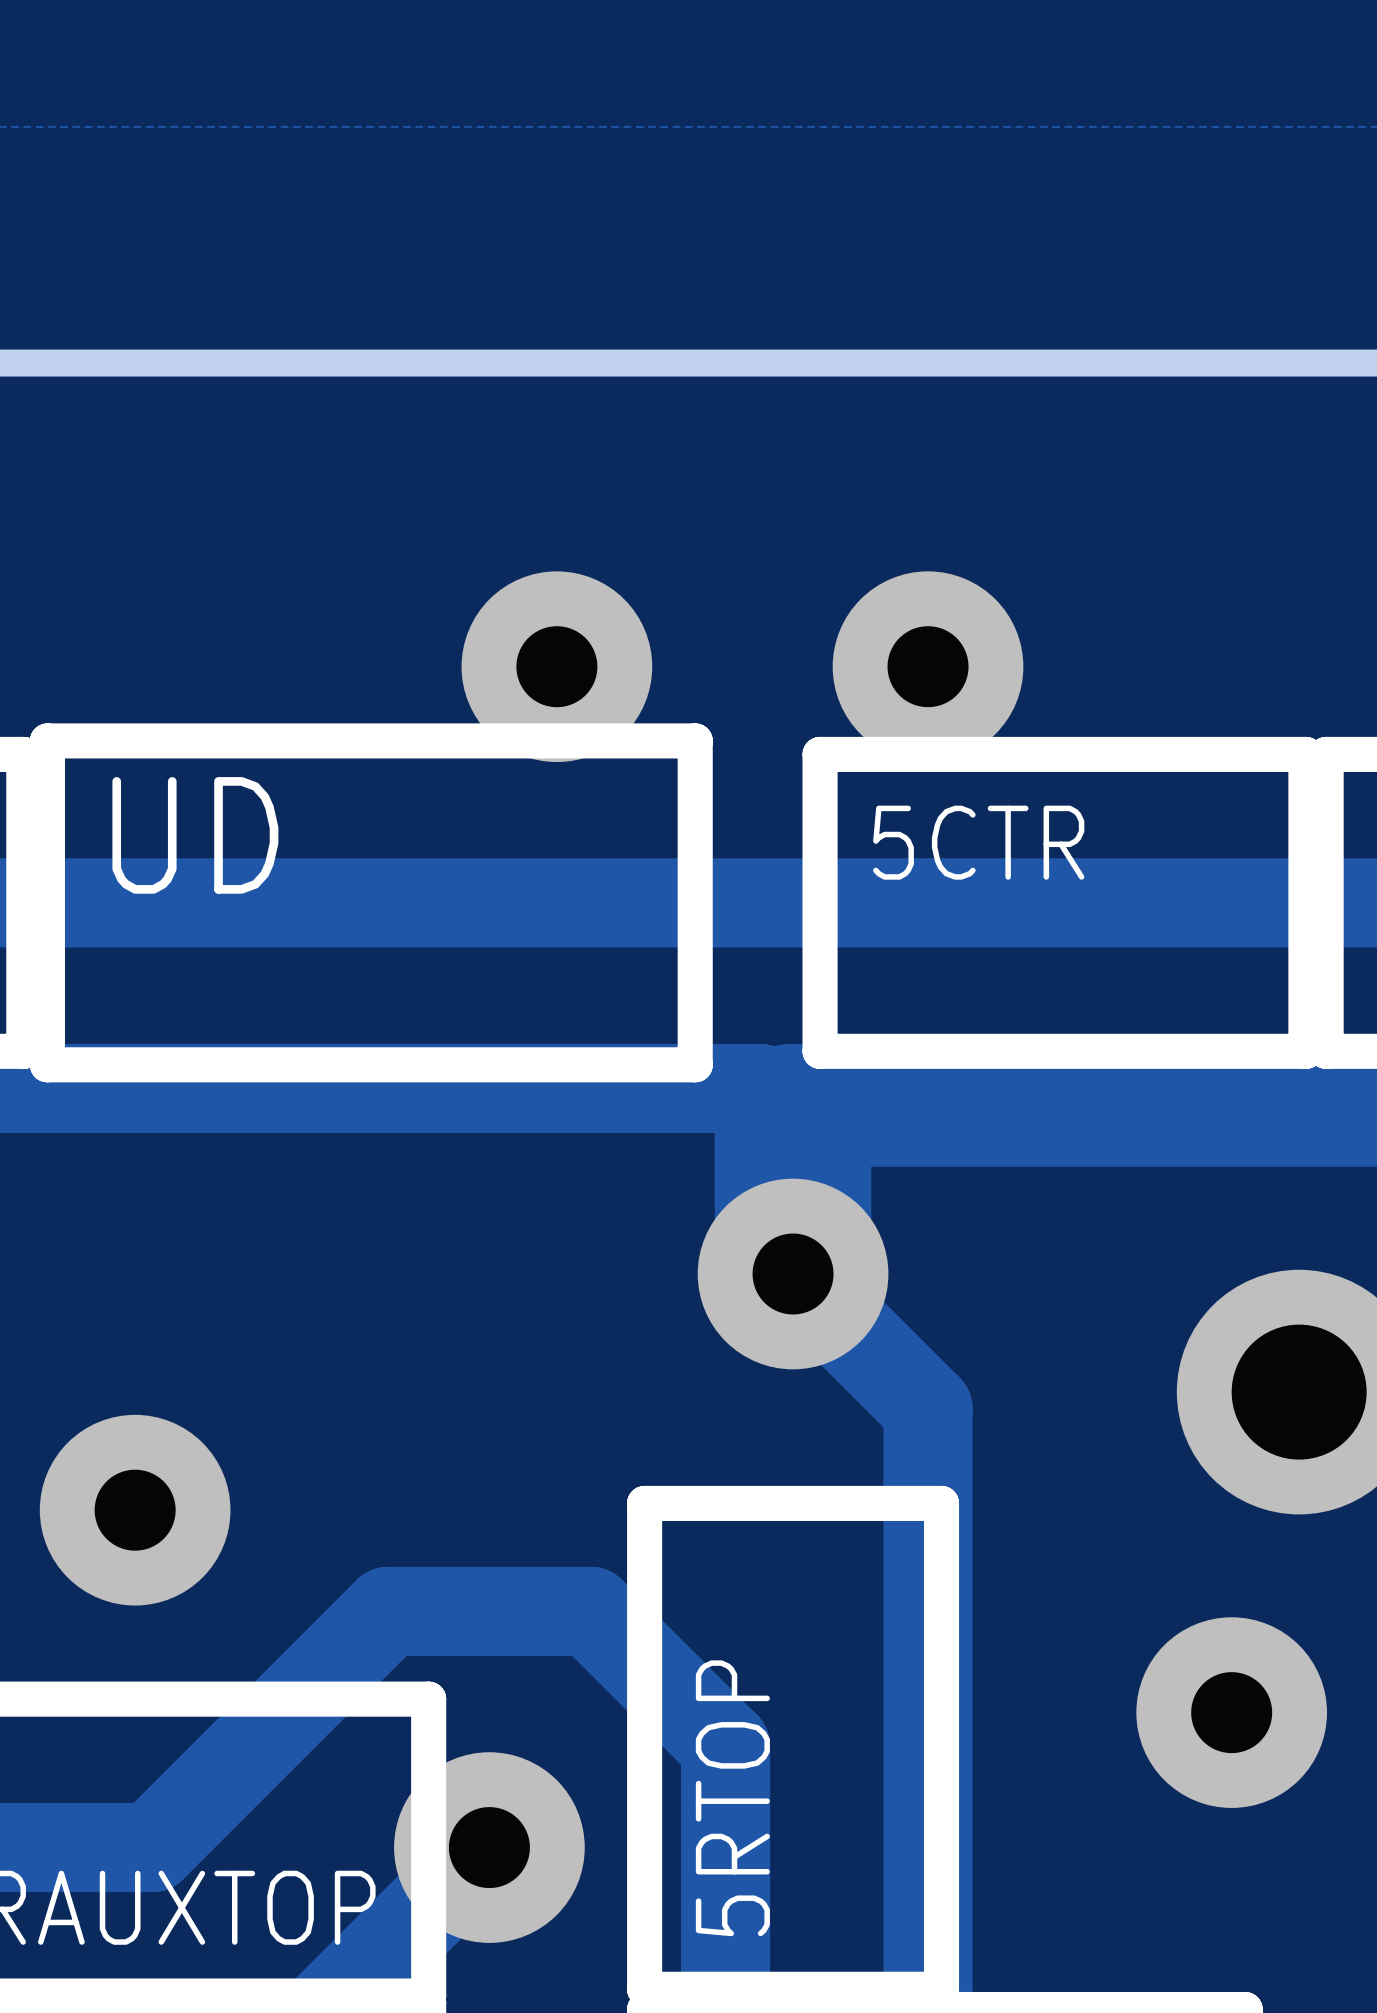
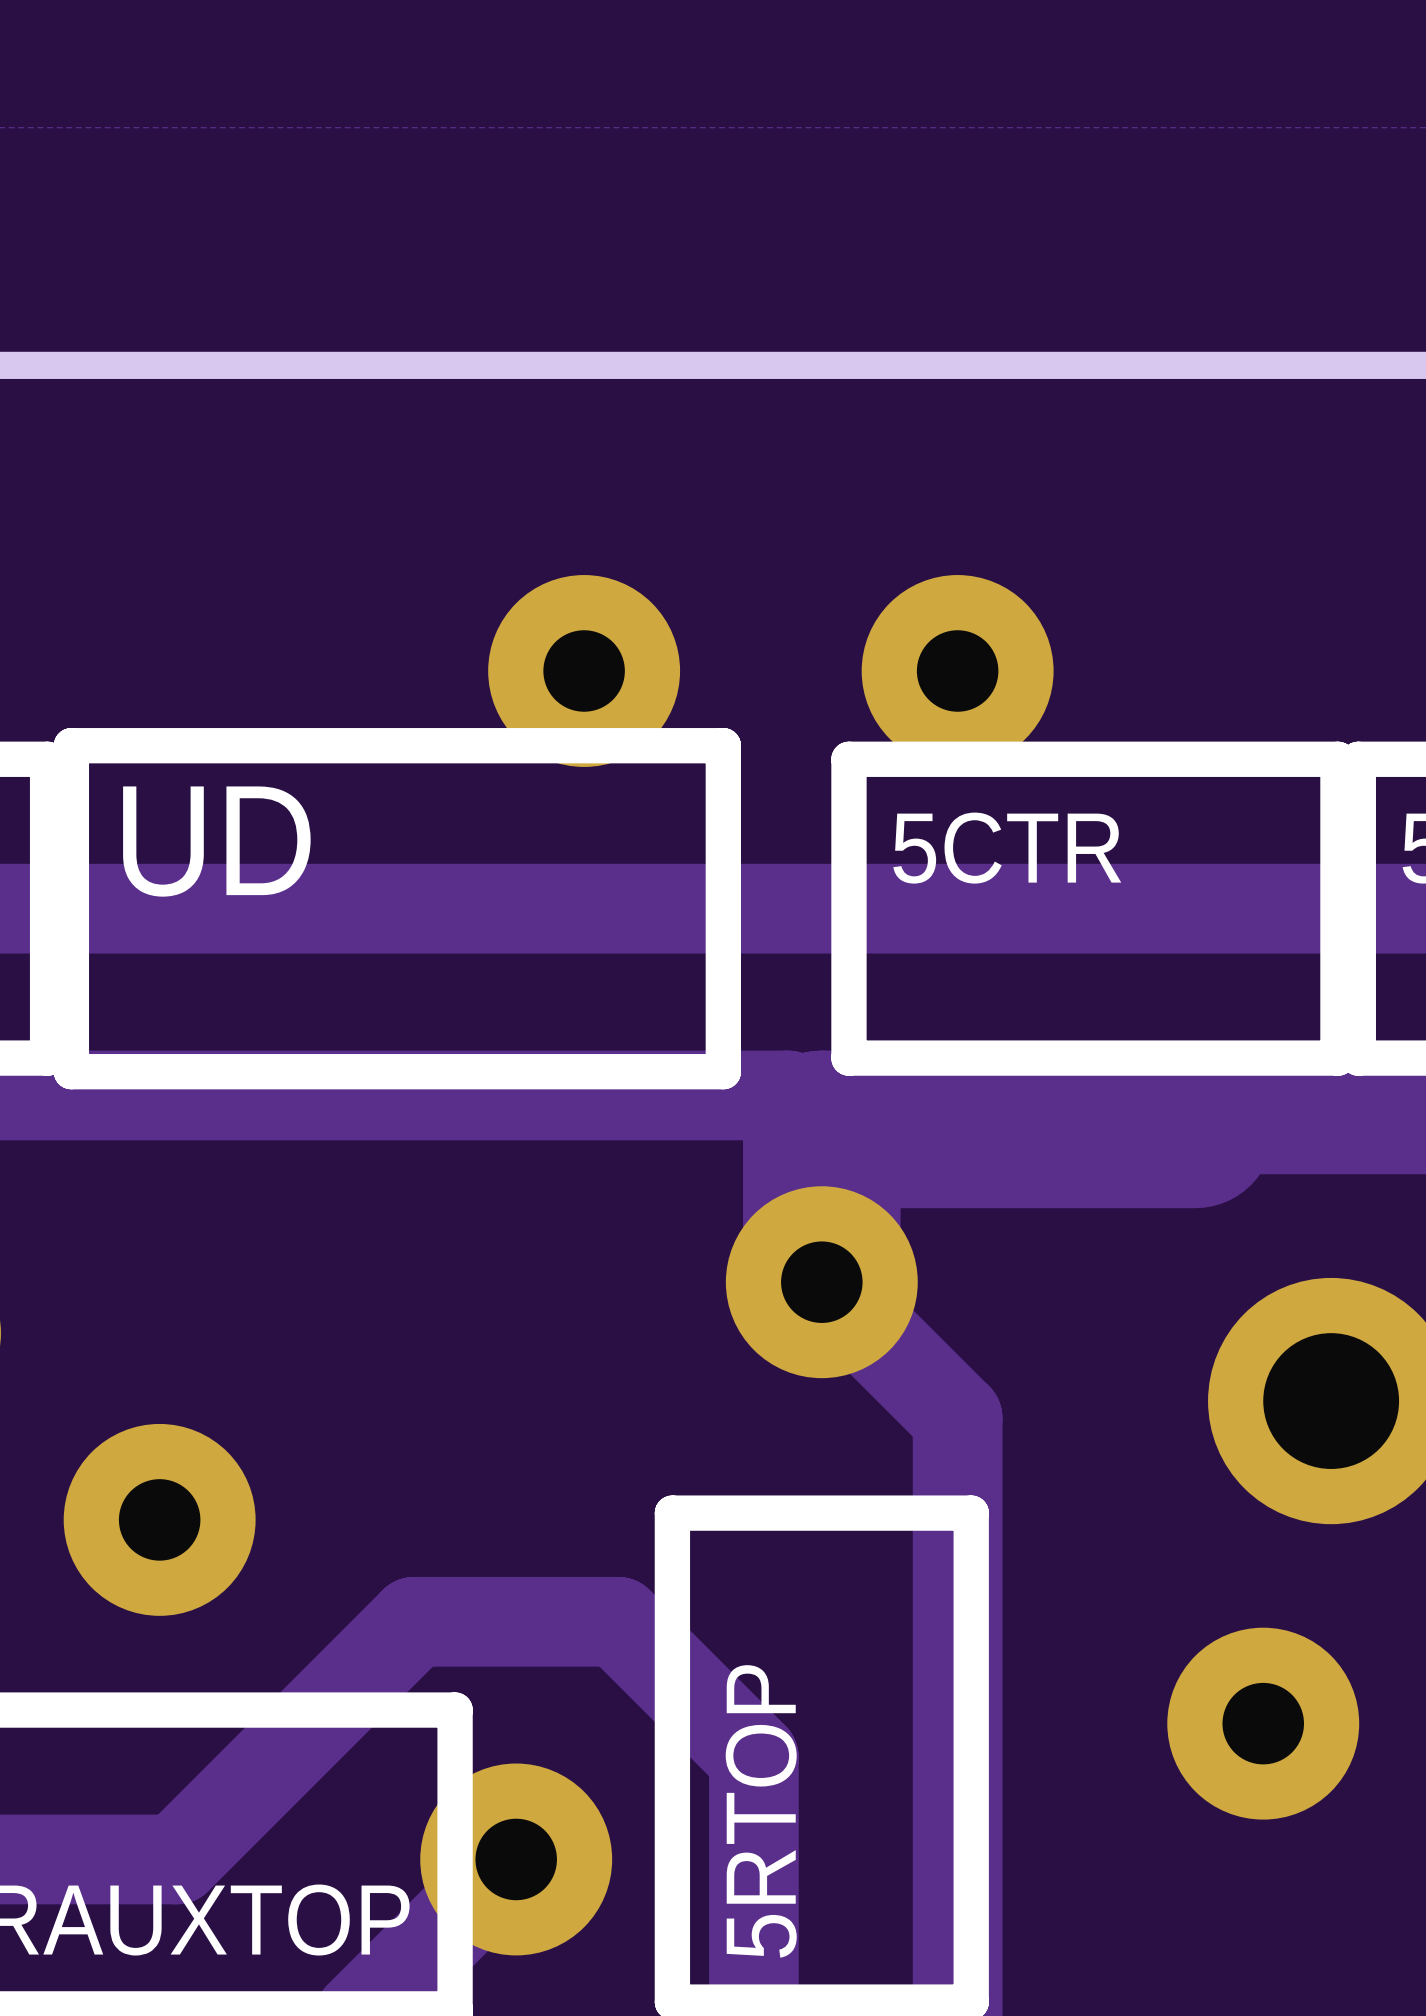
track: (1164, 1105) (793, 1105) (793, 1122) -> (1195, 1112) (1195, 1129) (821, 1129)

